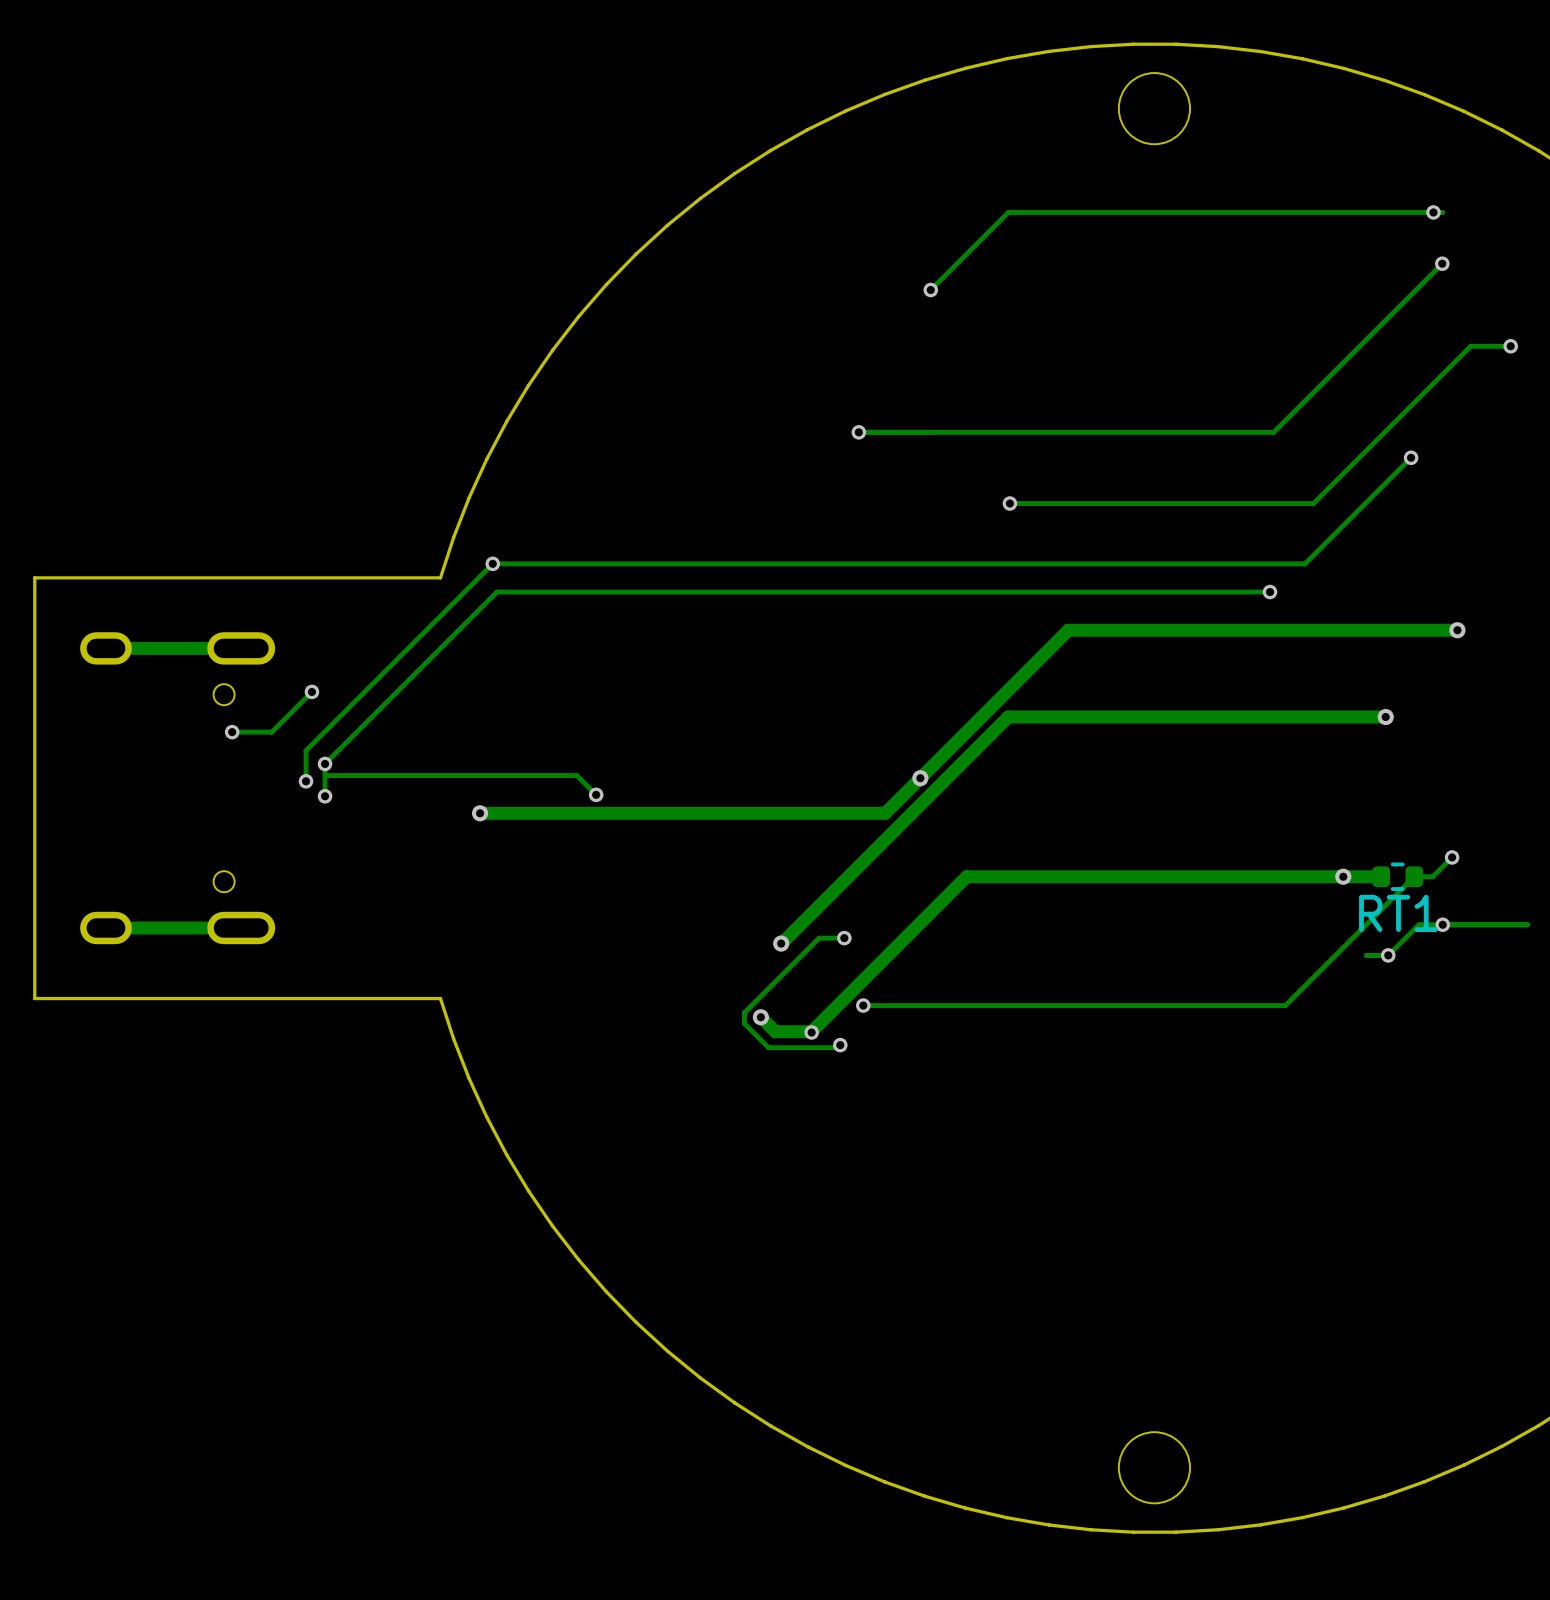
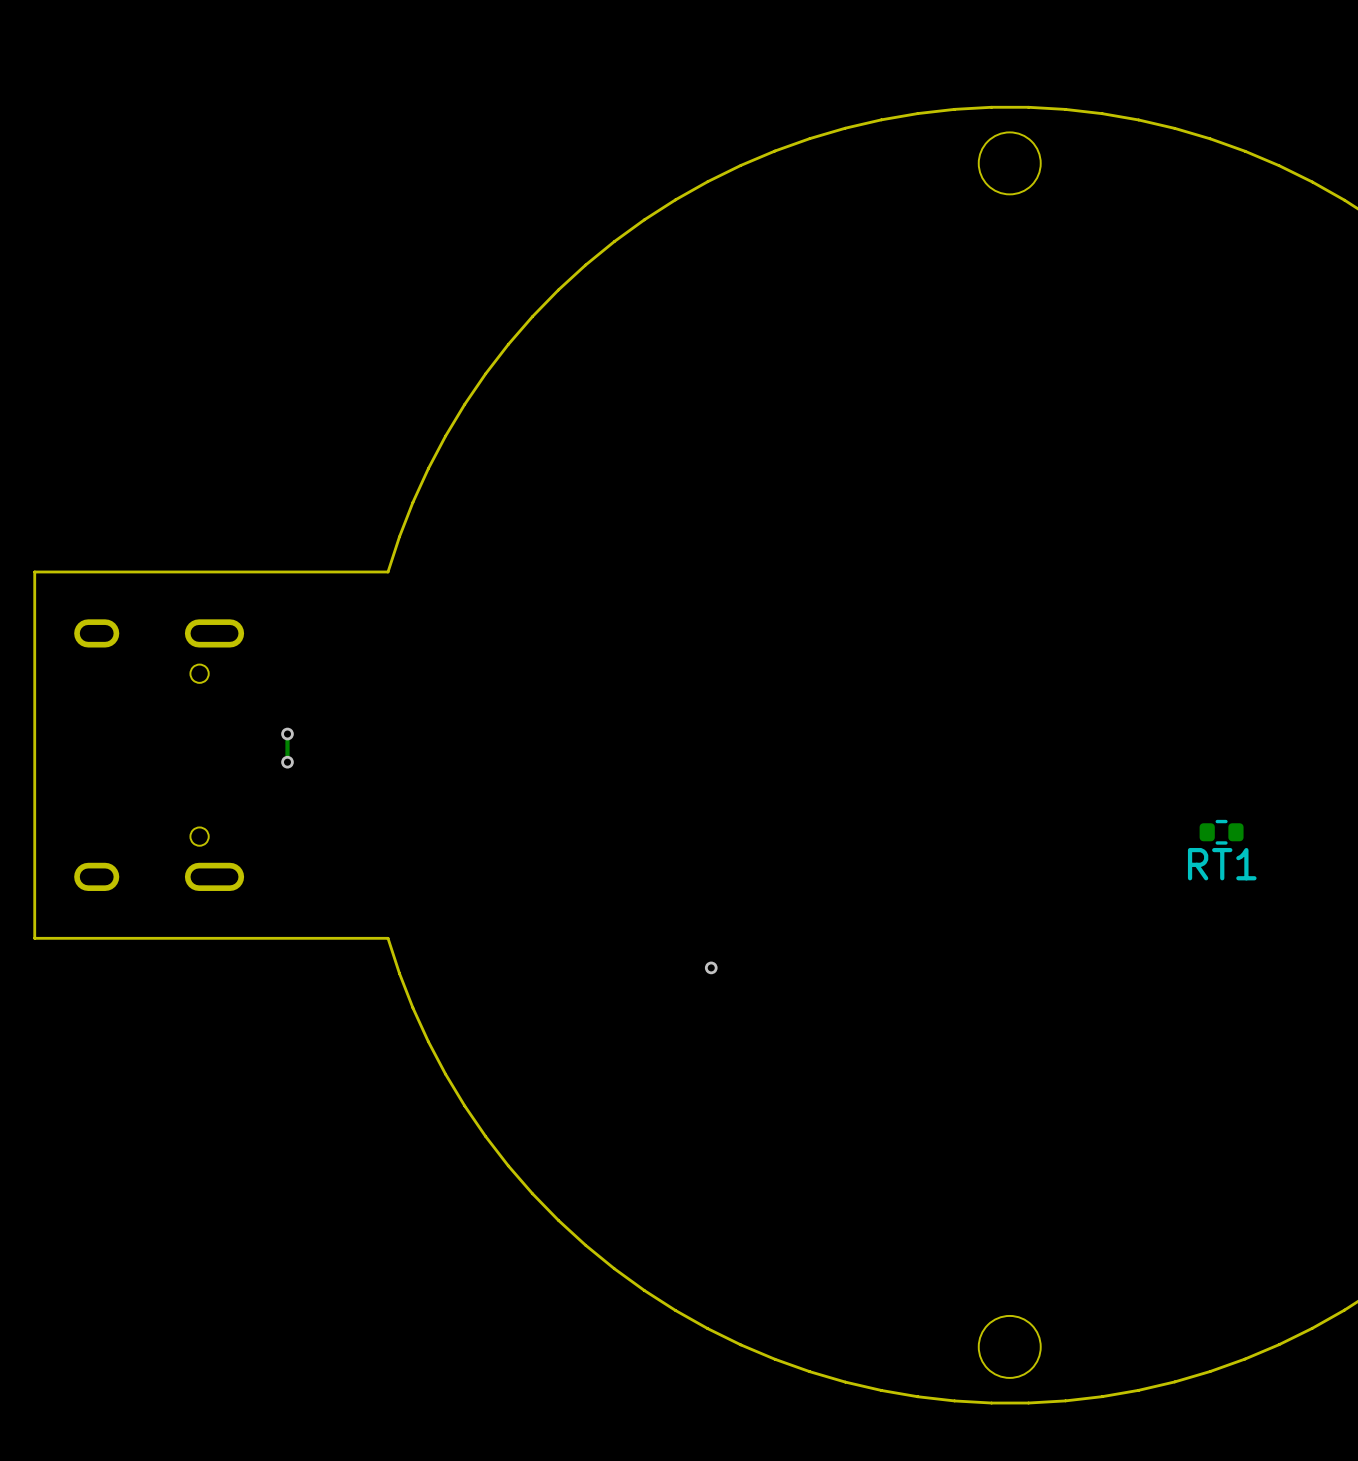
via: (1433, 212) -> none
track: (1442, 212) (1008, 212) (930, 290) -> none
track: (1442, 263) (1273, 432) (858, 432) -> none
via: (1442, 263) -> none
via: (930, 290) -> none
track: (1510, 346) (1470, 346) (1313, 503) (1009, 503) -> none
via: (1510, 346) -> none
via: (858, 432) -> none
track: (1411, 457) (1305, 563) (492, 563) (306, 750) (306, 781) -> none
via: (1411, 457) -> none
via: (1009, 503) -> none
via: (492, 563) -> none
track: (1270, 592) (496, 592) (325, 763) -> none
via: (1270, 592) -> none
track: (1457, 630) (1068, 630) (885, 813) (480, 813) -> none
via: (1457, 630) -> none
track: (241, 648) (105, 648) -> none
track: (311, 691) (271, 732) (232, 732) -> none
via: (311, 691) -> none
track: (1385, 717) (1008, 717) (781, 943) -> none
via: (1385, 717) -> none
via: (232, 732) -> none
track: (325, 775) (576, 775) (596, 794) -> none
via: (920, 778) -> none
via: (306, 781) -> none
via: (596, 794) -> none
via: (480, 813) -> none
track: (1452, 857) (1432, 876) (1414, 876) (1285, 1005) (863, 1005) -> none
via: (1452, 857) -> none
via: (1343, 876) -> none
track: (1381, 876) (966, 876) (811, 1031) -> none
via: (1442, 924) -> none
track: (1527, 924) (1418, 924) (1388, 955) (1366, 955) -> none
track: (241, 927) (105, 927) -> none
via: (844, 938) -> none
track: (848, 938) (819, 938) (744, 1012) (744, 1023) (768, 1047) (837, 1047) (840, 1045) -> none
via: (781, 943) -> none
via: (1388, 955) -> none
via: (863, 1005) -> none
track: (760, 1017) (775, 1031) (811, 1031) -> none
via: (760, 1017) -> none
via: (840, 1045) -> none

